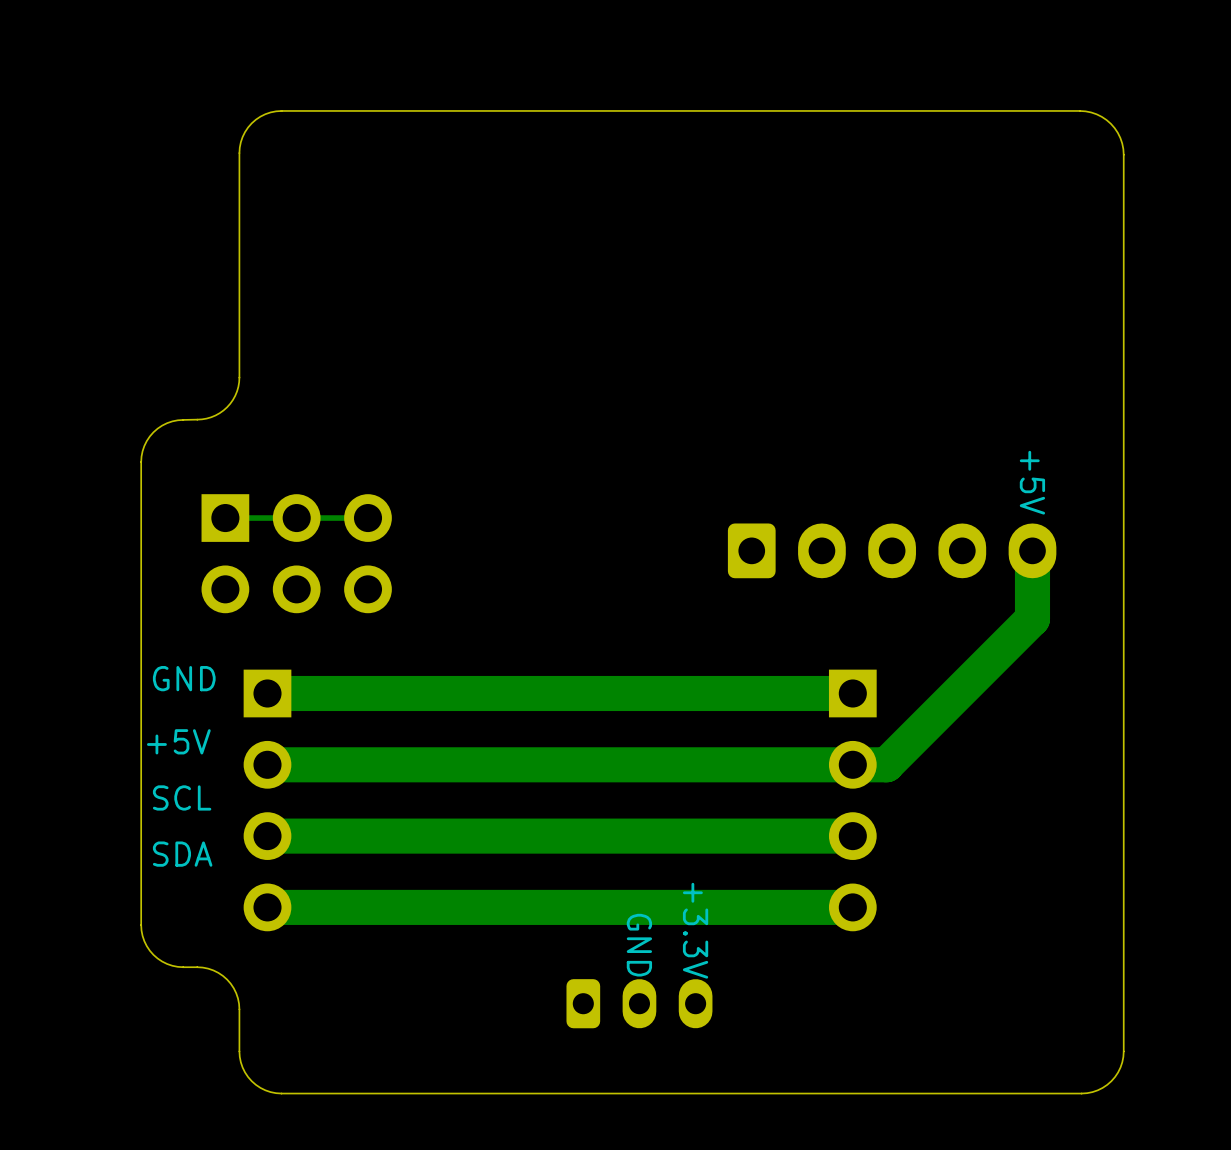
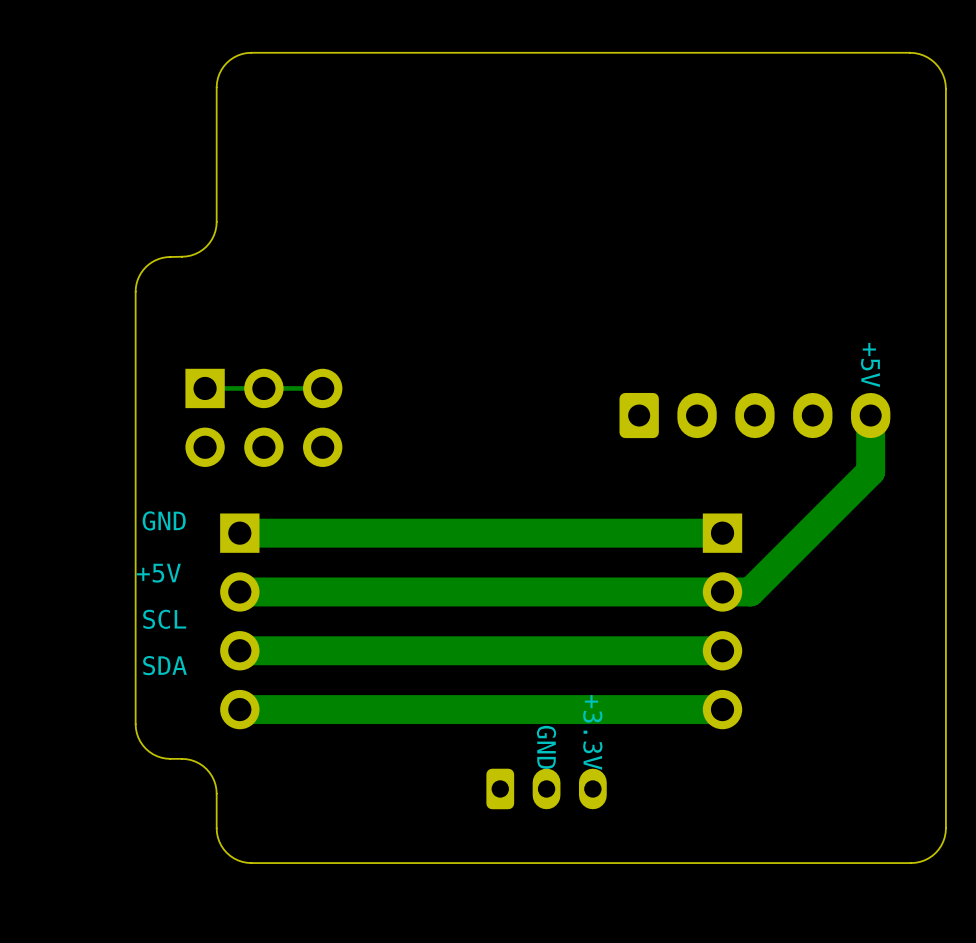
board edge: (239, 316) (239, 377) -> none
board edge: (239, 377) (235, 395) (223, 410) (206, 418) (177, 420) (162, 425) (146, 440) (141, 462) -> (216, 222) (212, 239) (203, 249) (190, 255) (158, 258) (148, 264) (140, 273) (135, 287) (135, 342)

